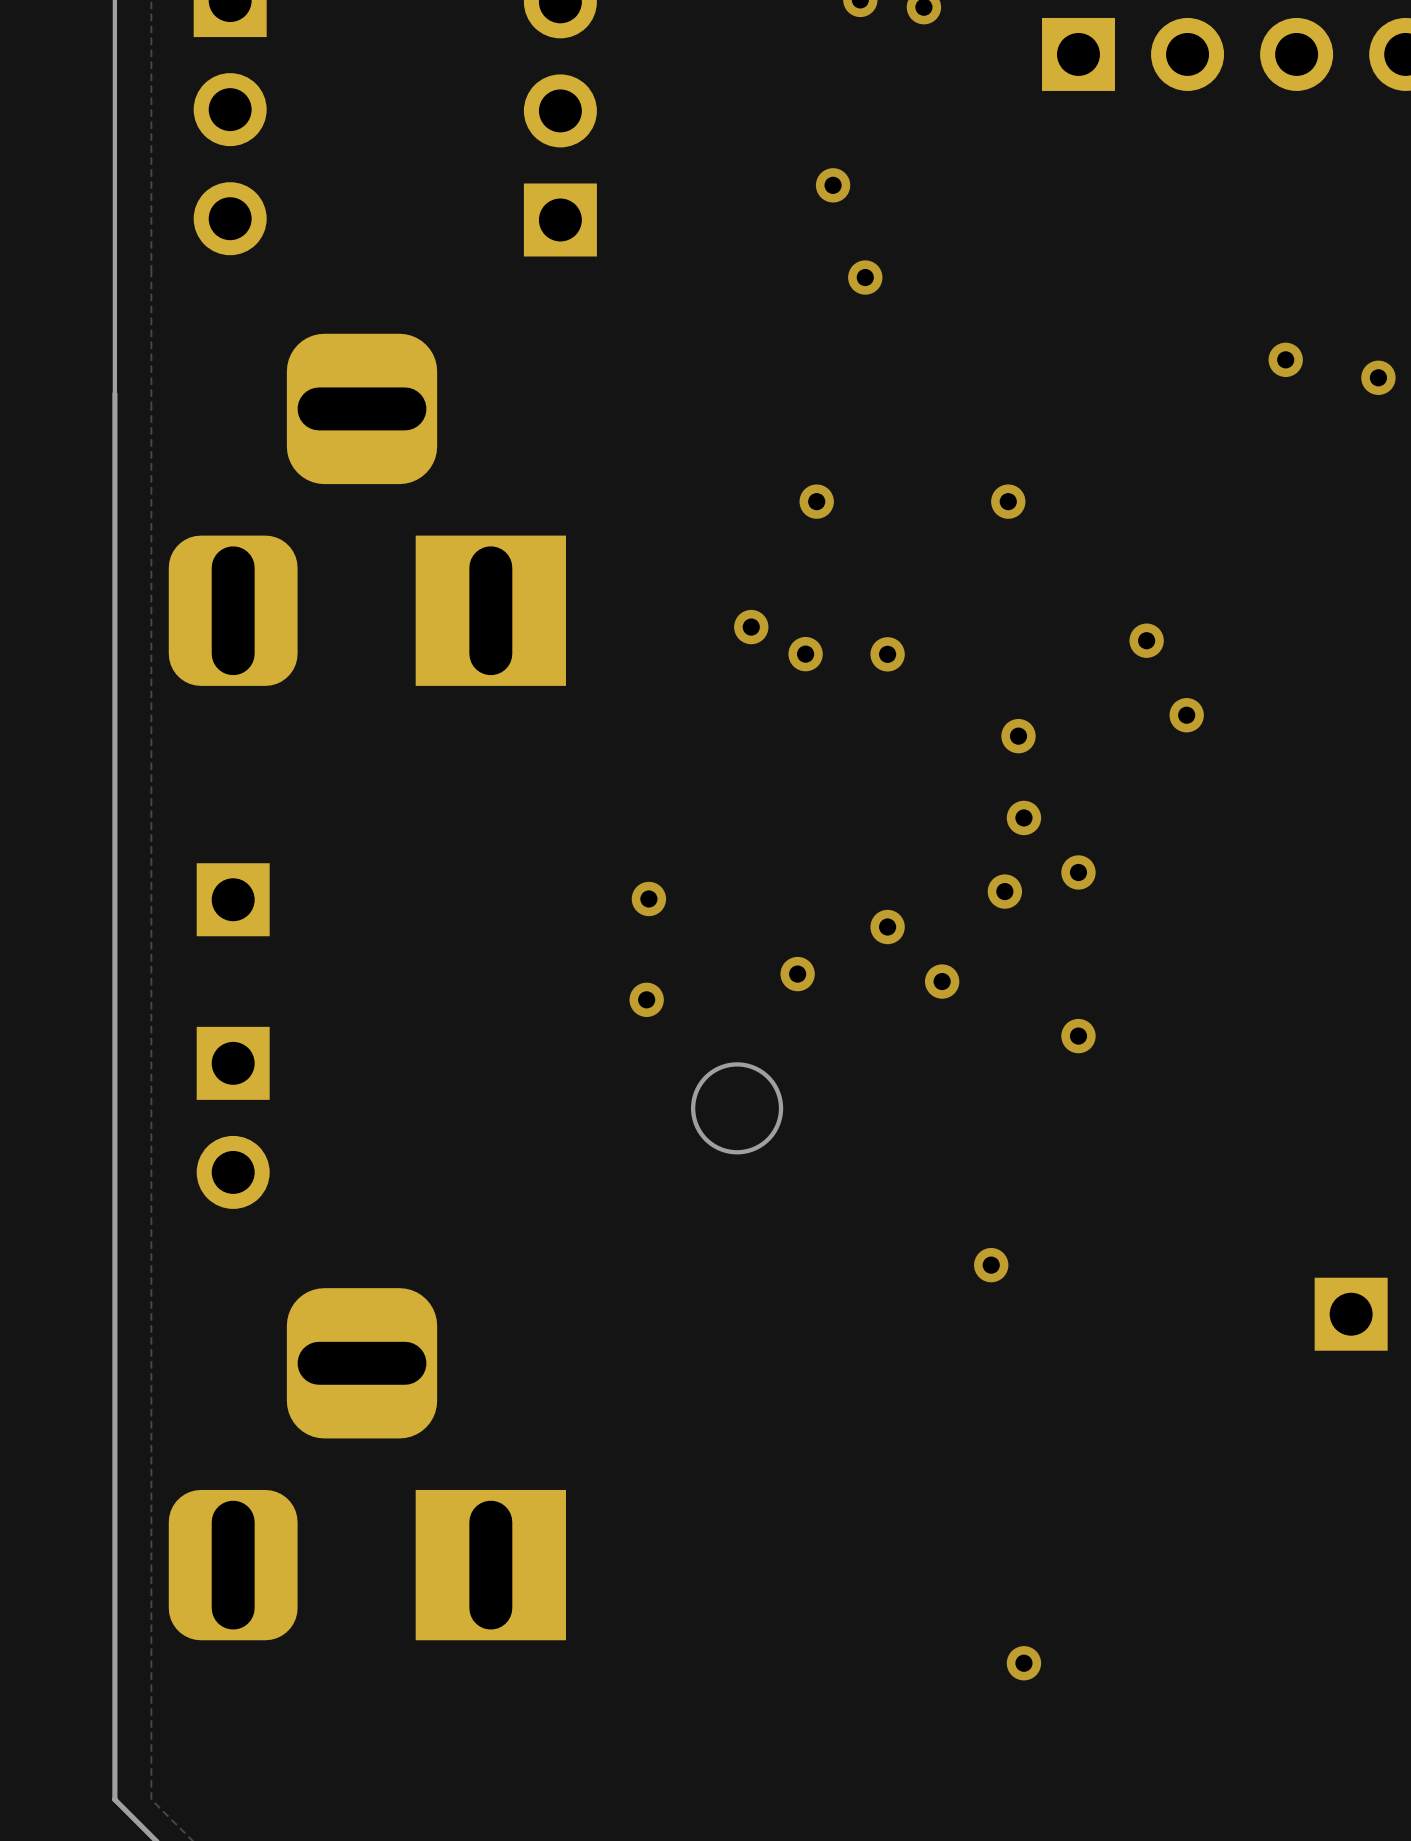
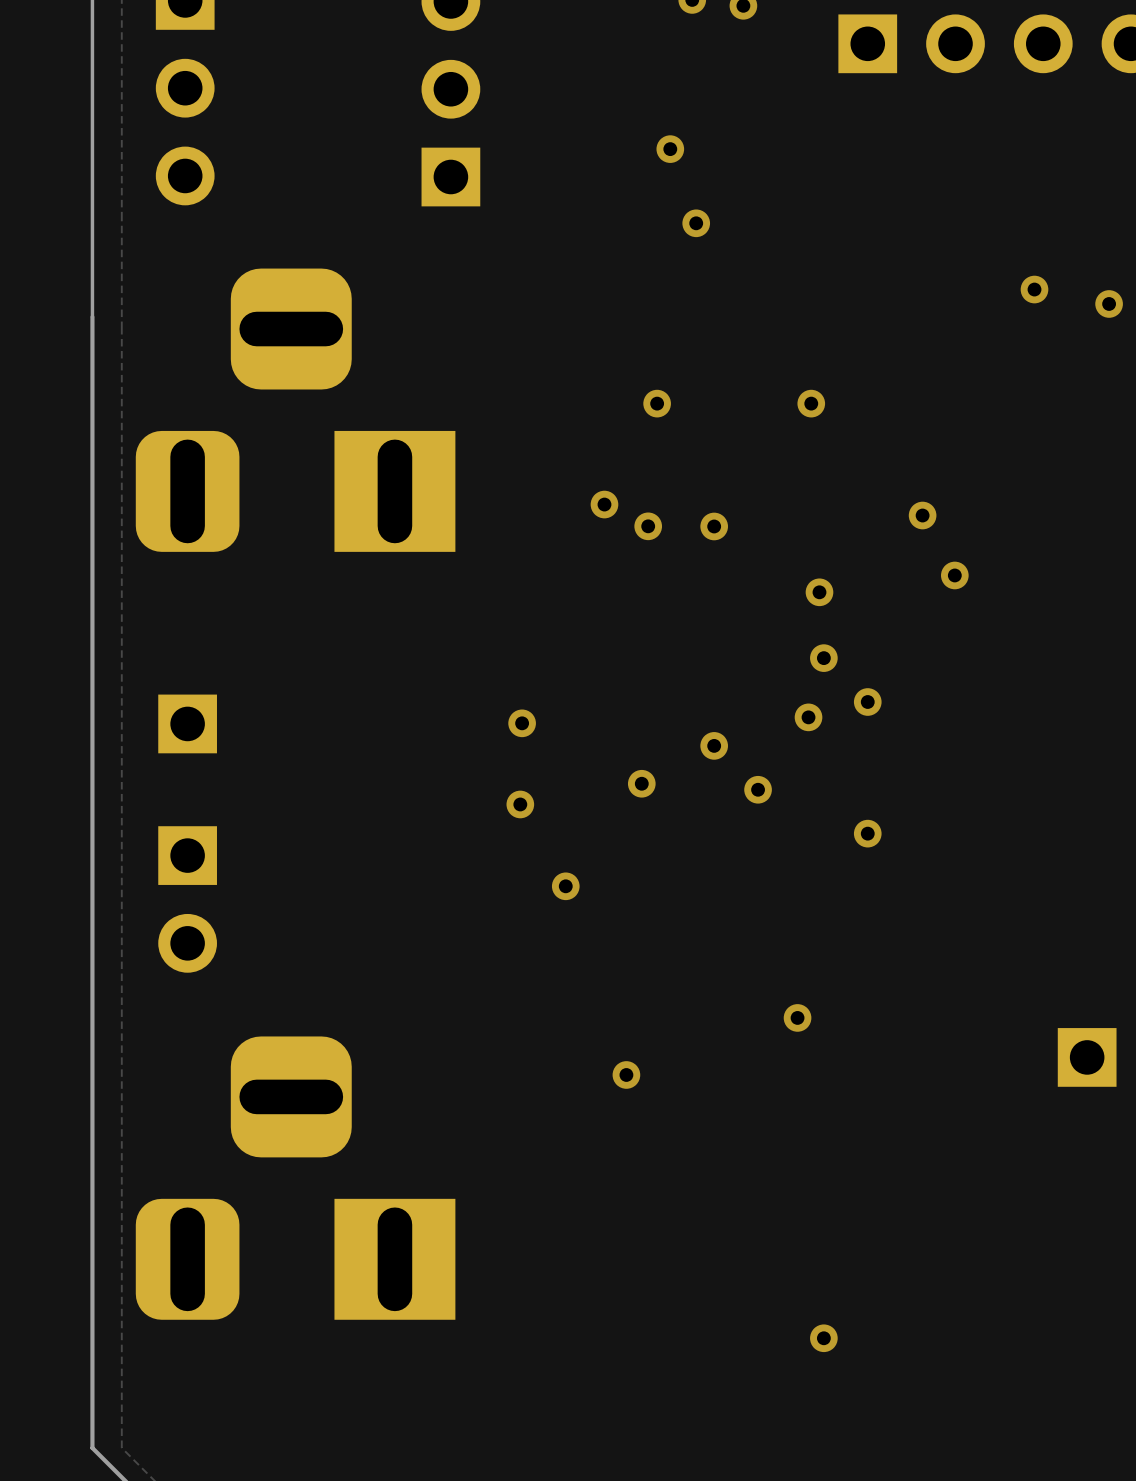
round board edge: [690, 1062, 784, 1155] -> none
via: none -> (565, 886)
via: none -> (626, 1074)

